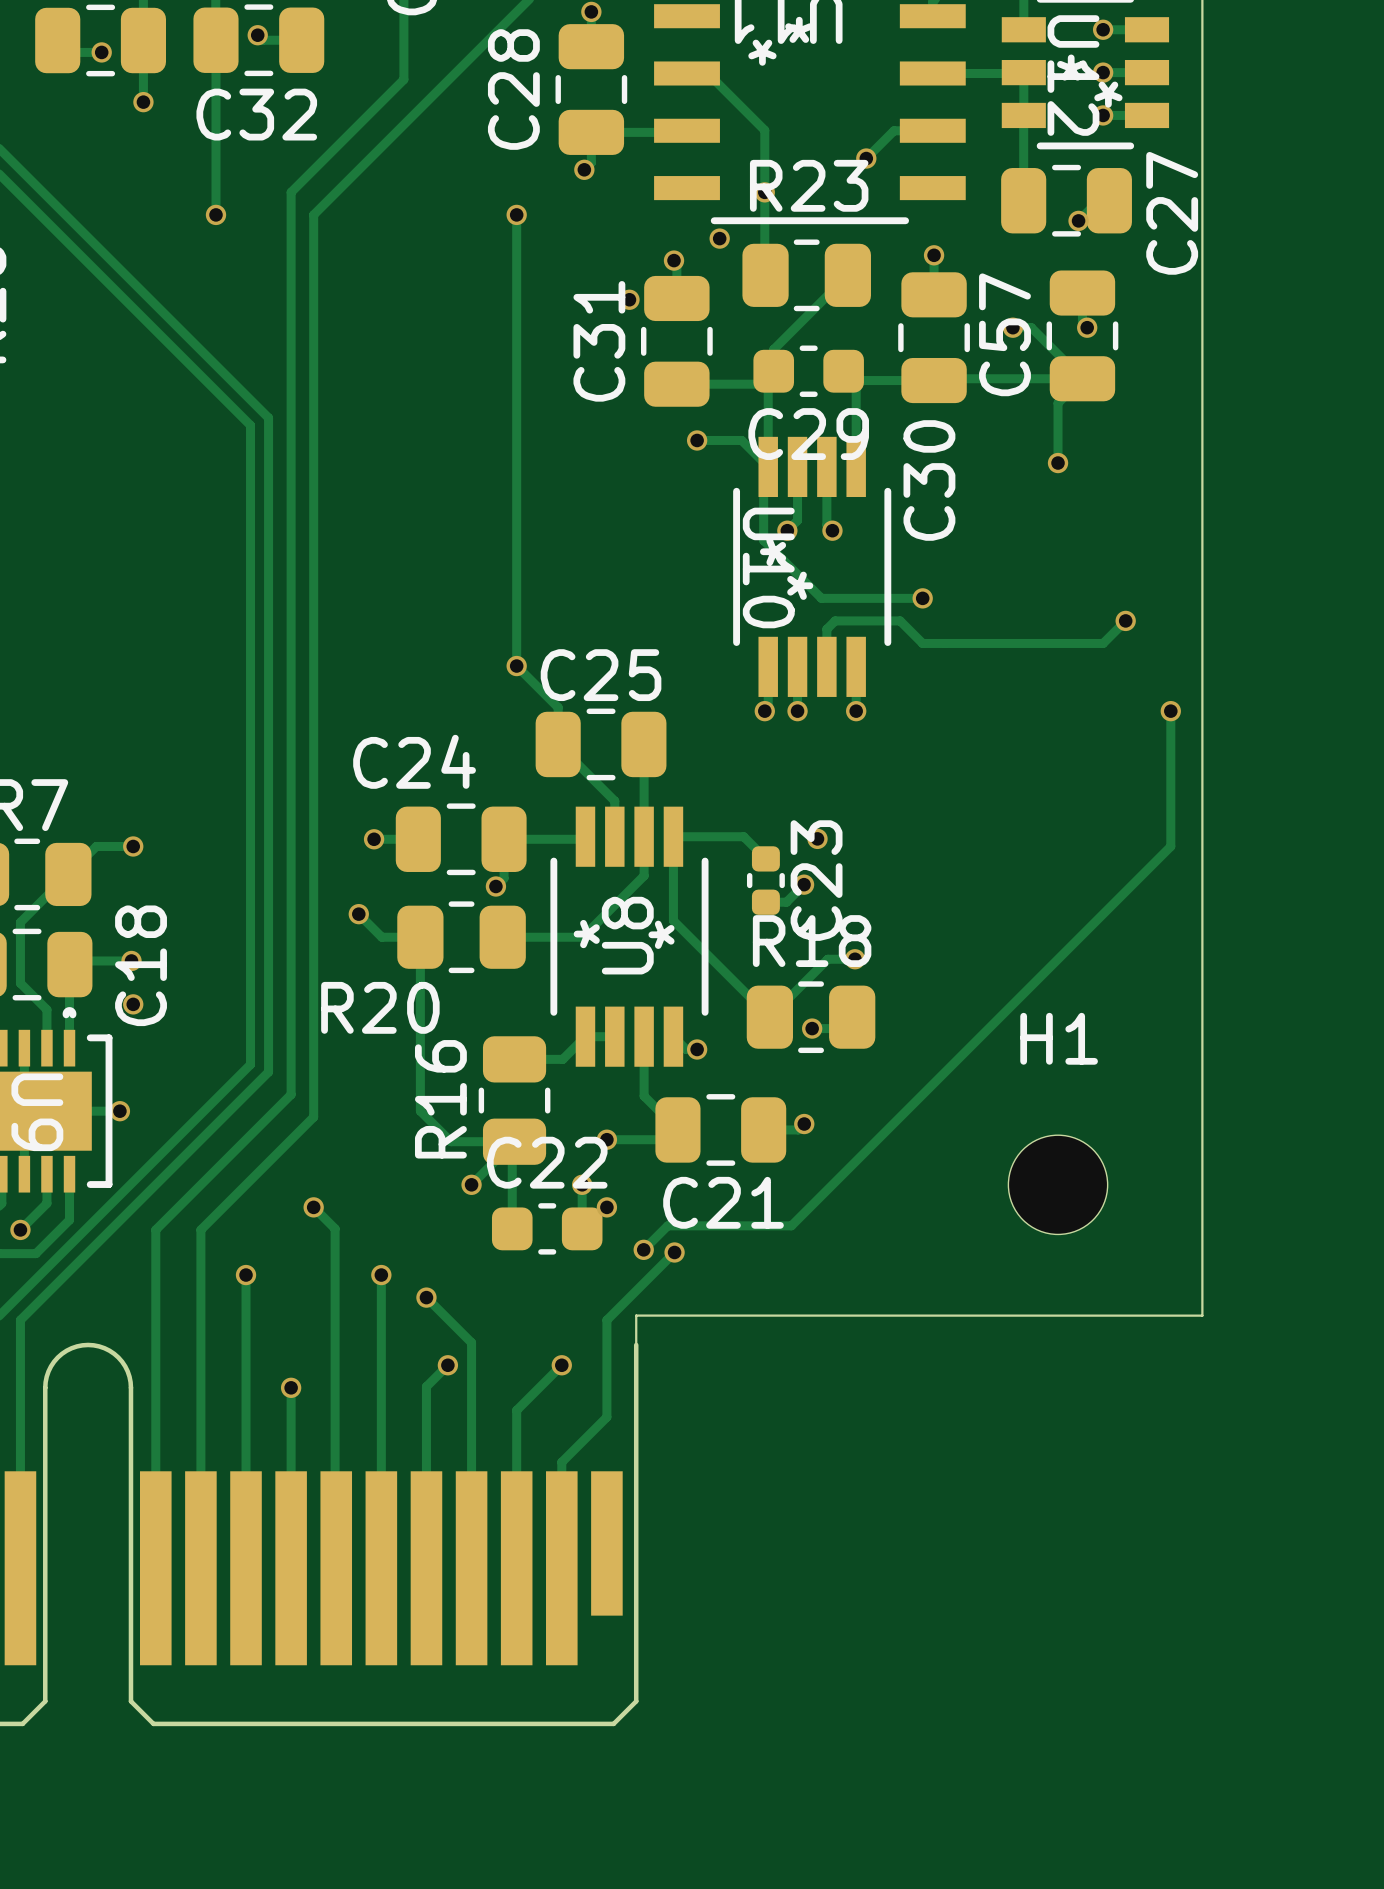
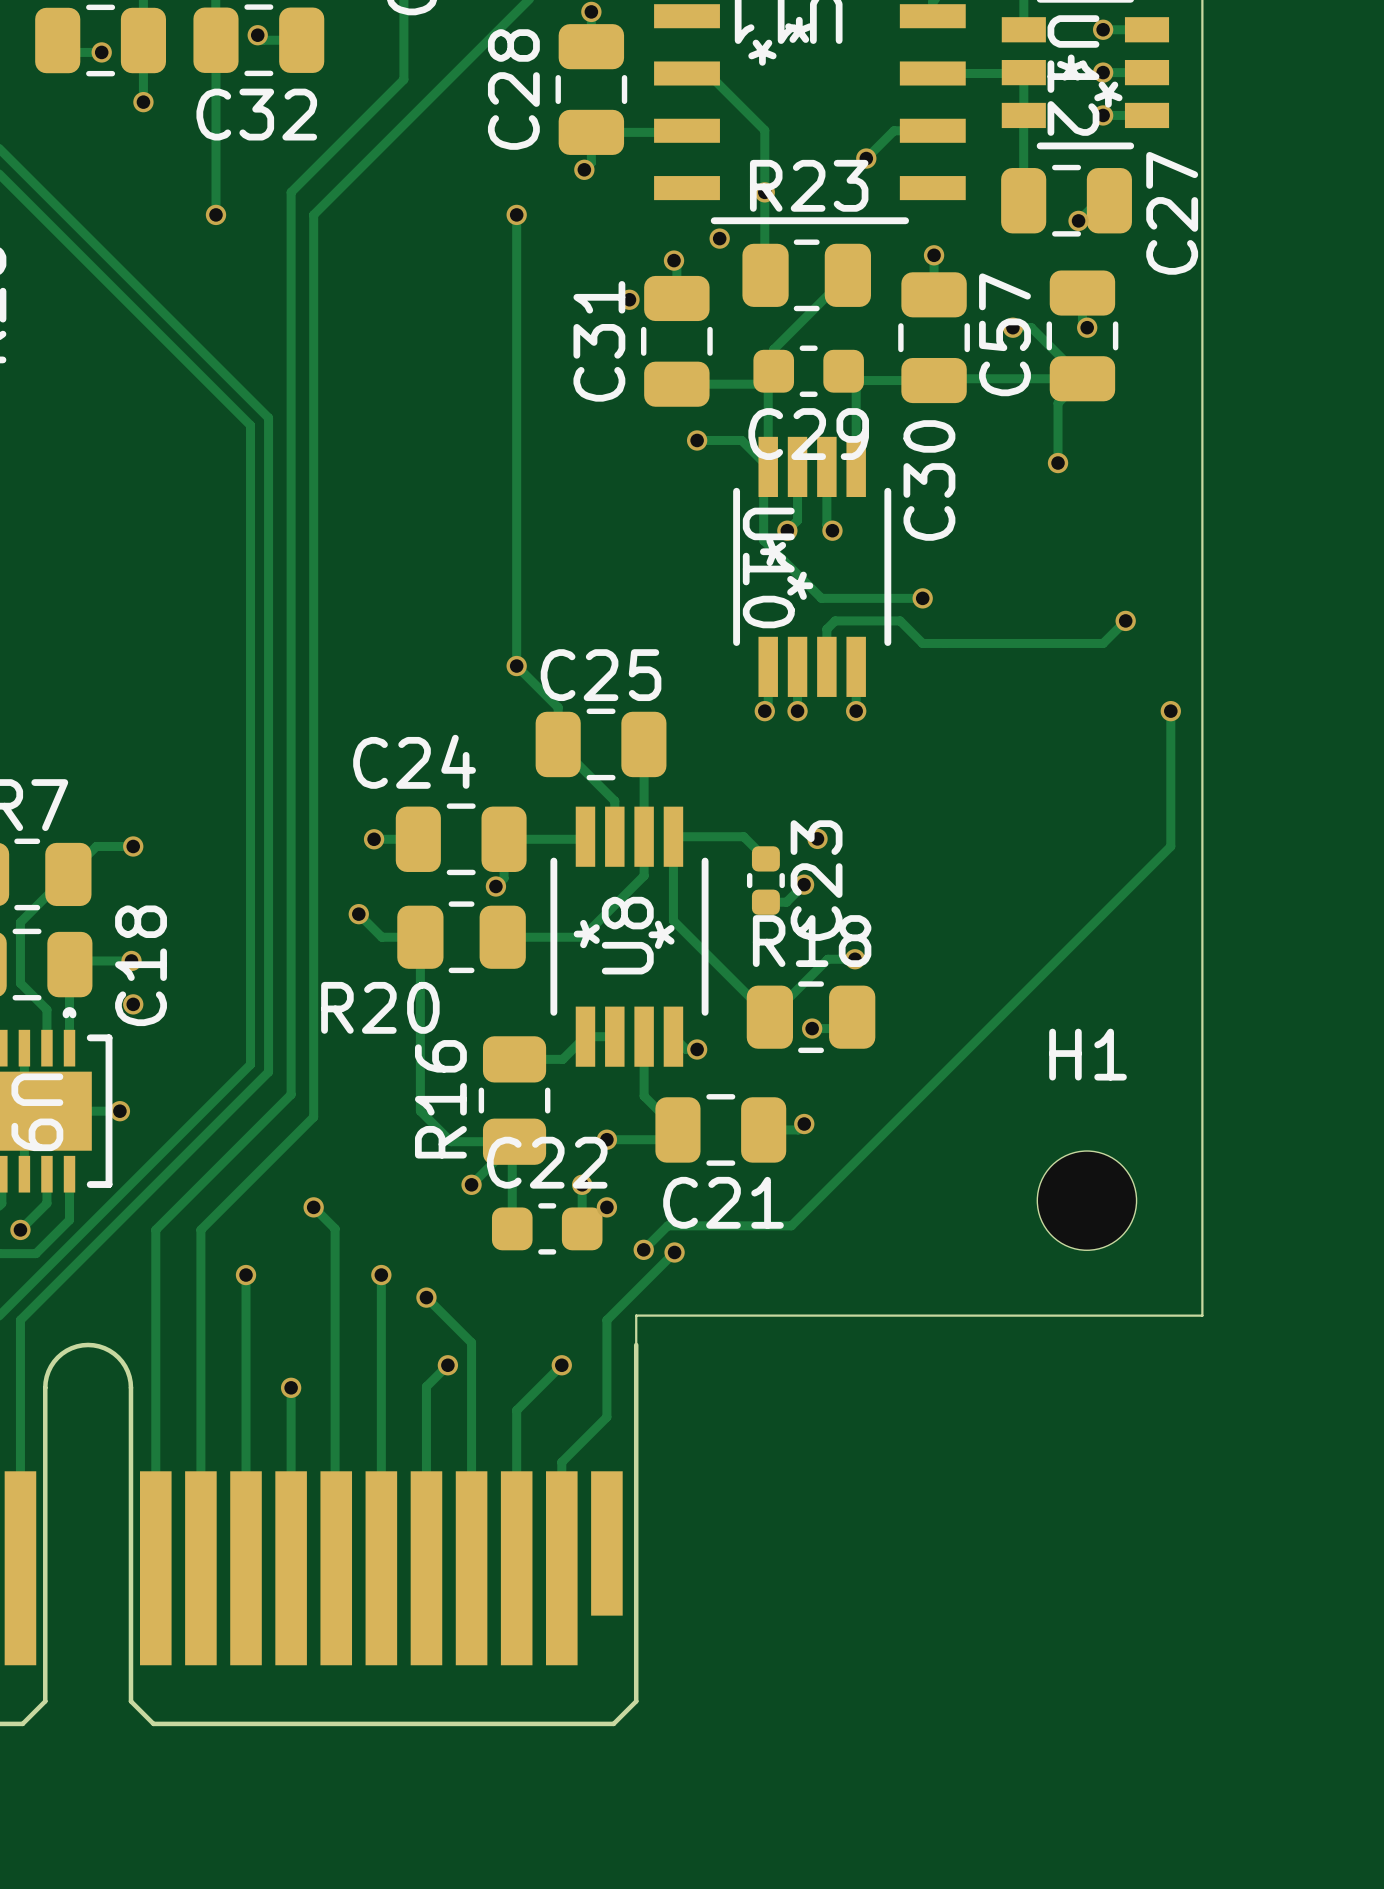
H1 position: (1058, 1184) -> (1086, 1200)

